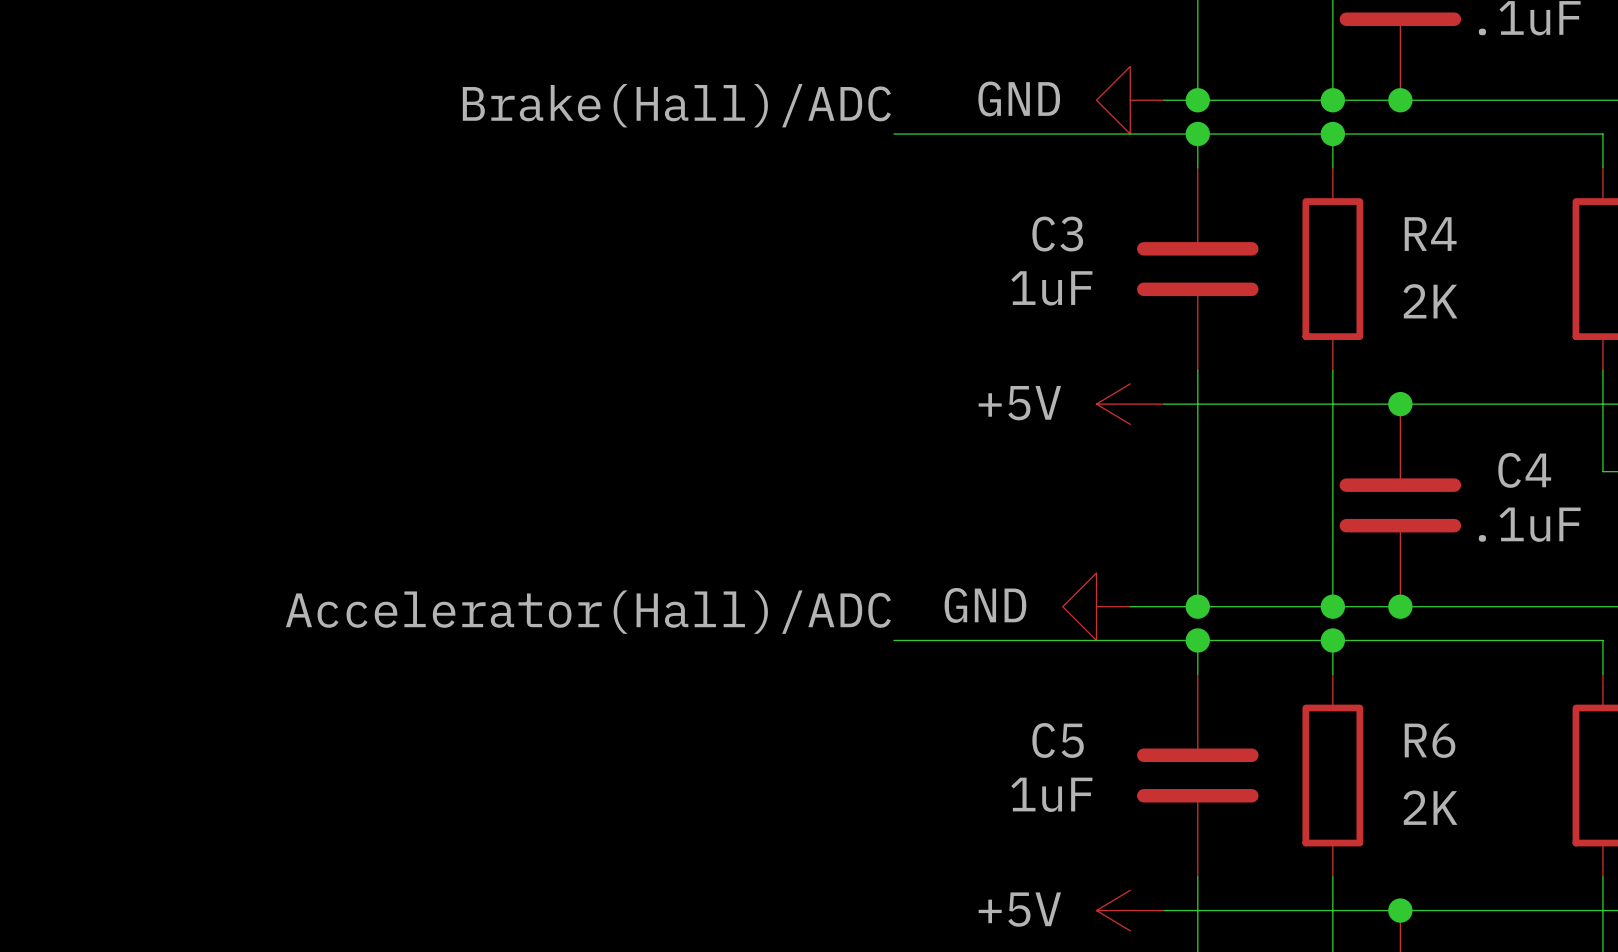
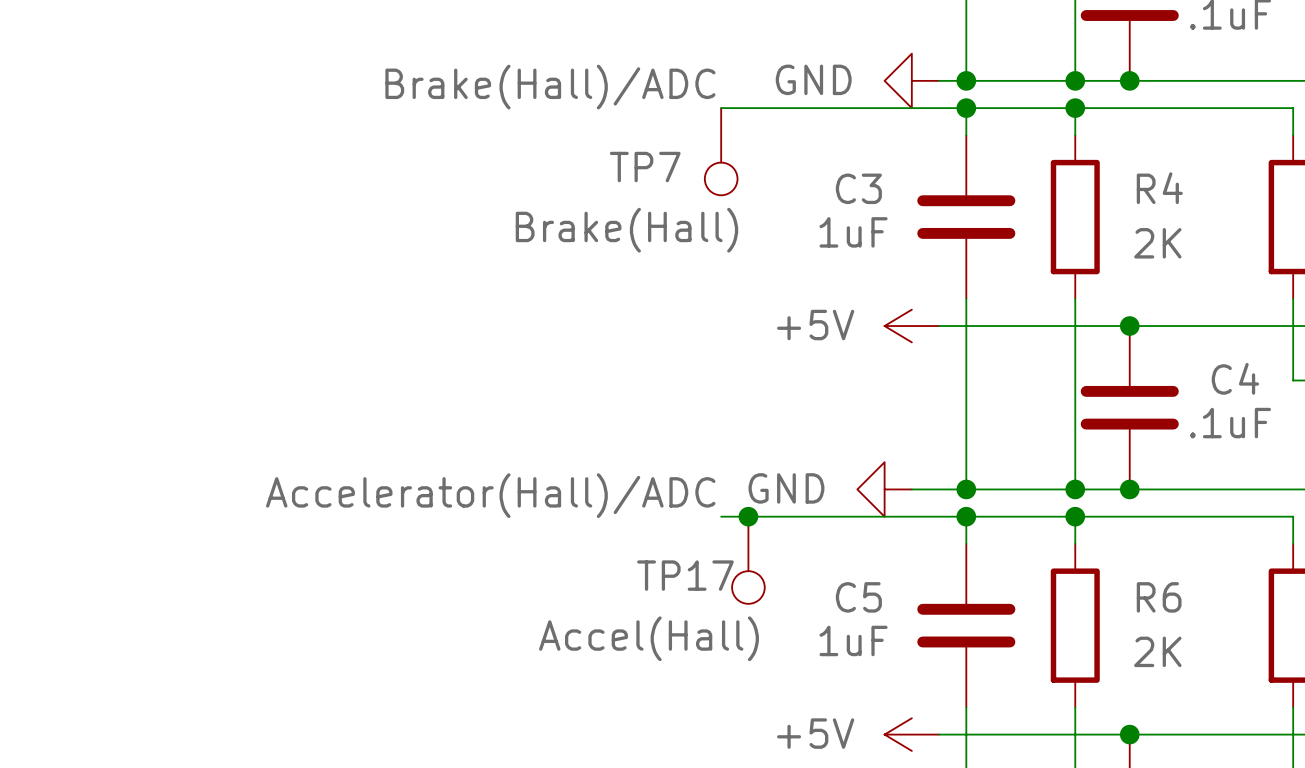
TP7: none -> Brake(Hall) (721, 151)
junction: none -> (748, 516)
TP17: none -> Accel(Hall) (748, 560)

